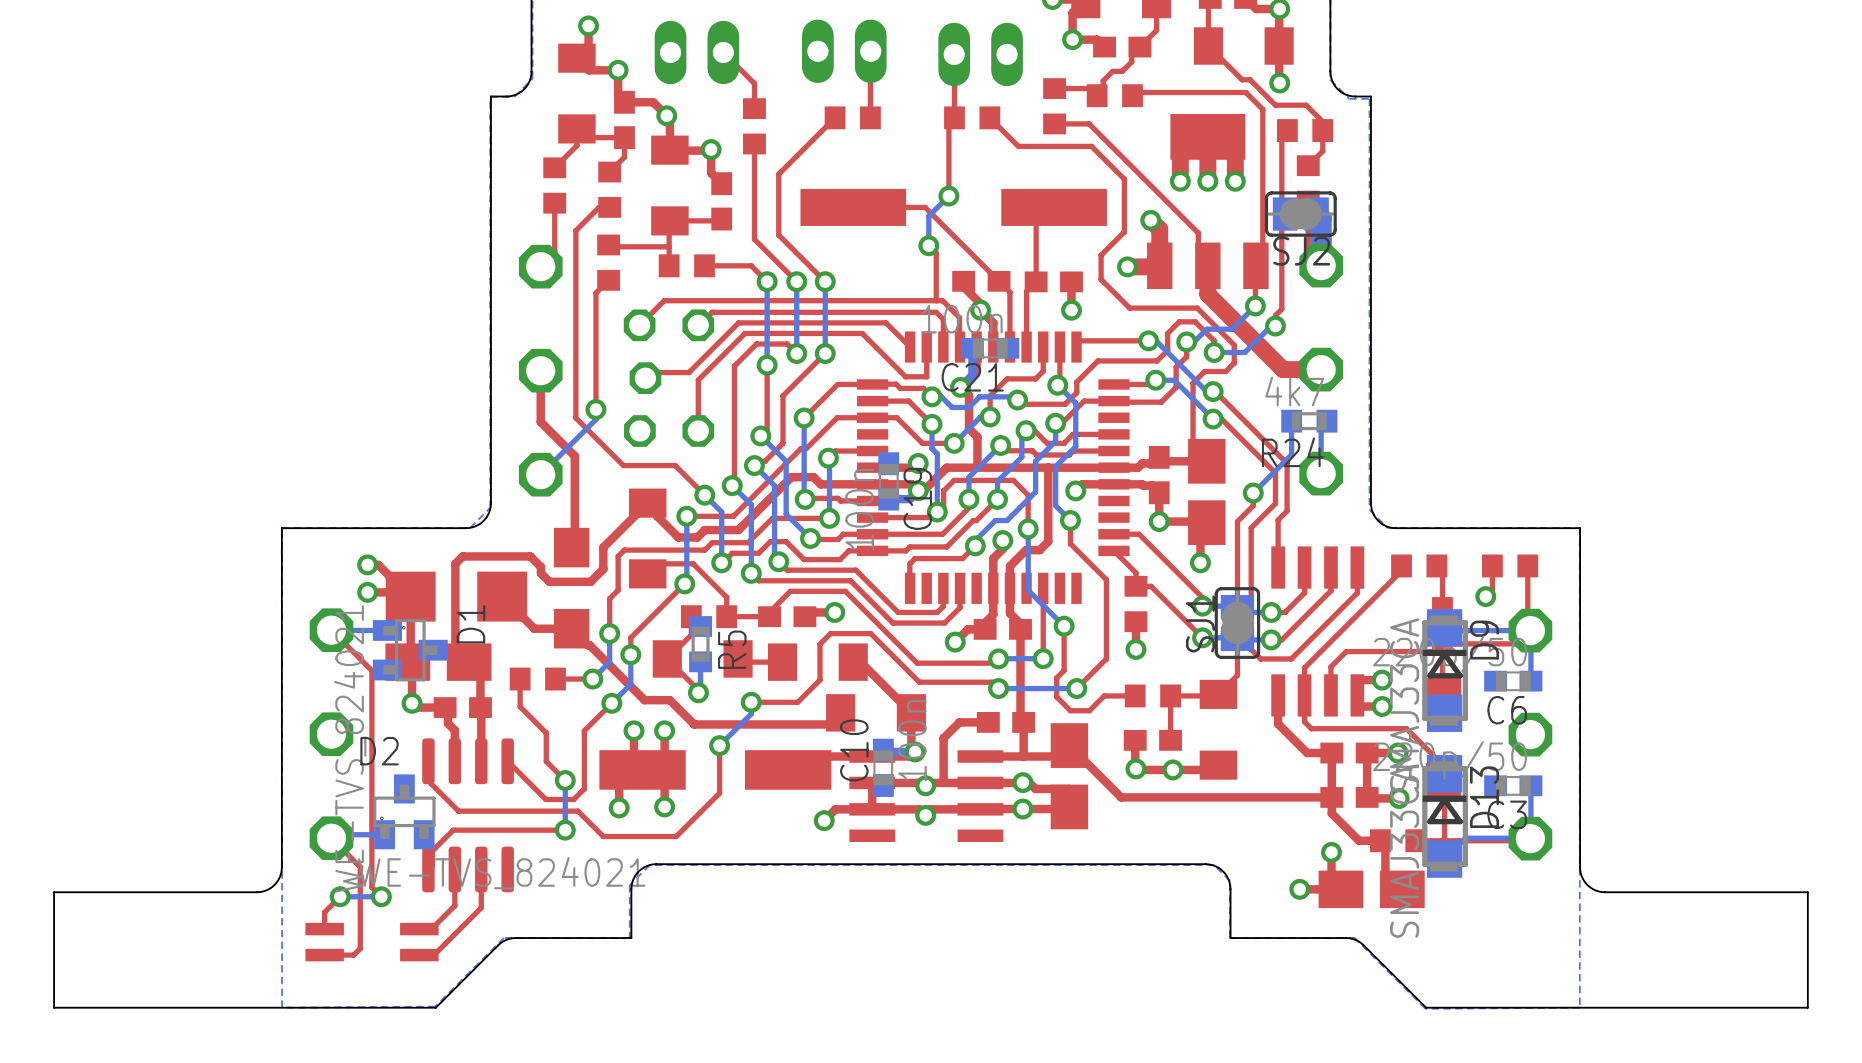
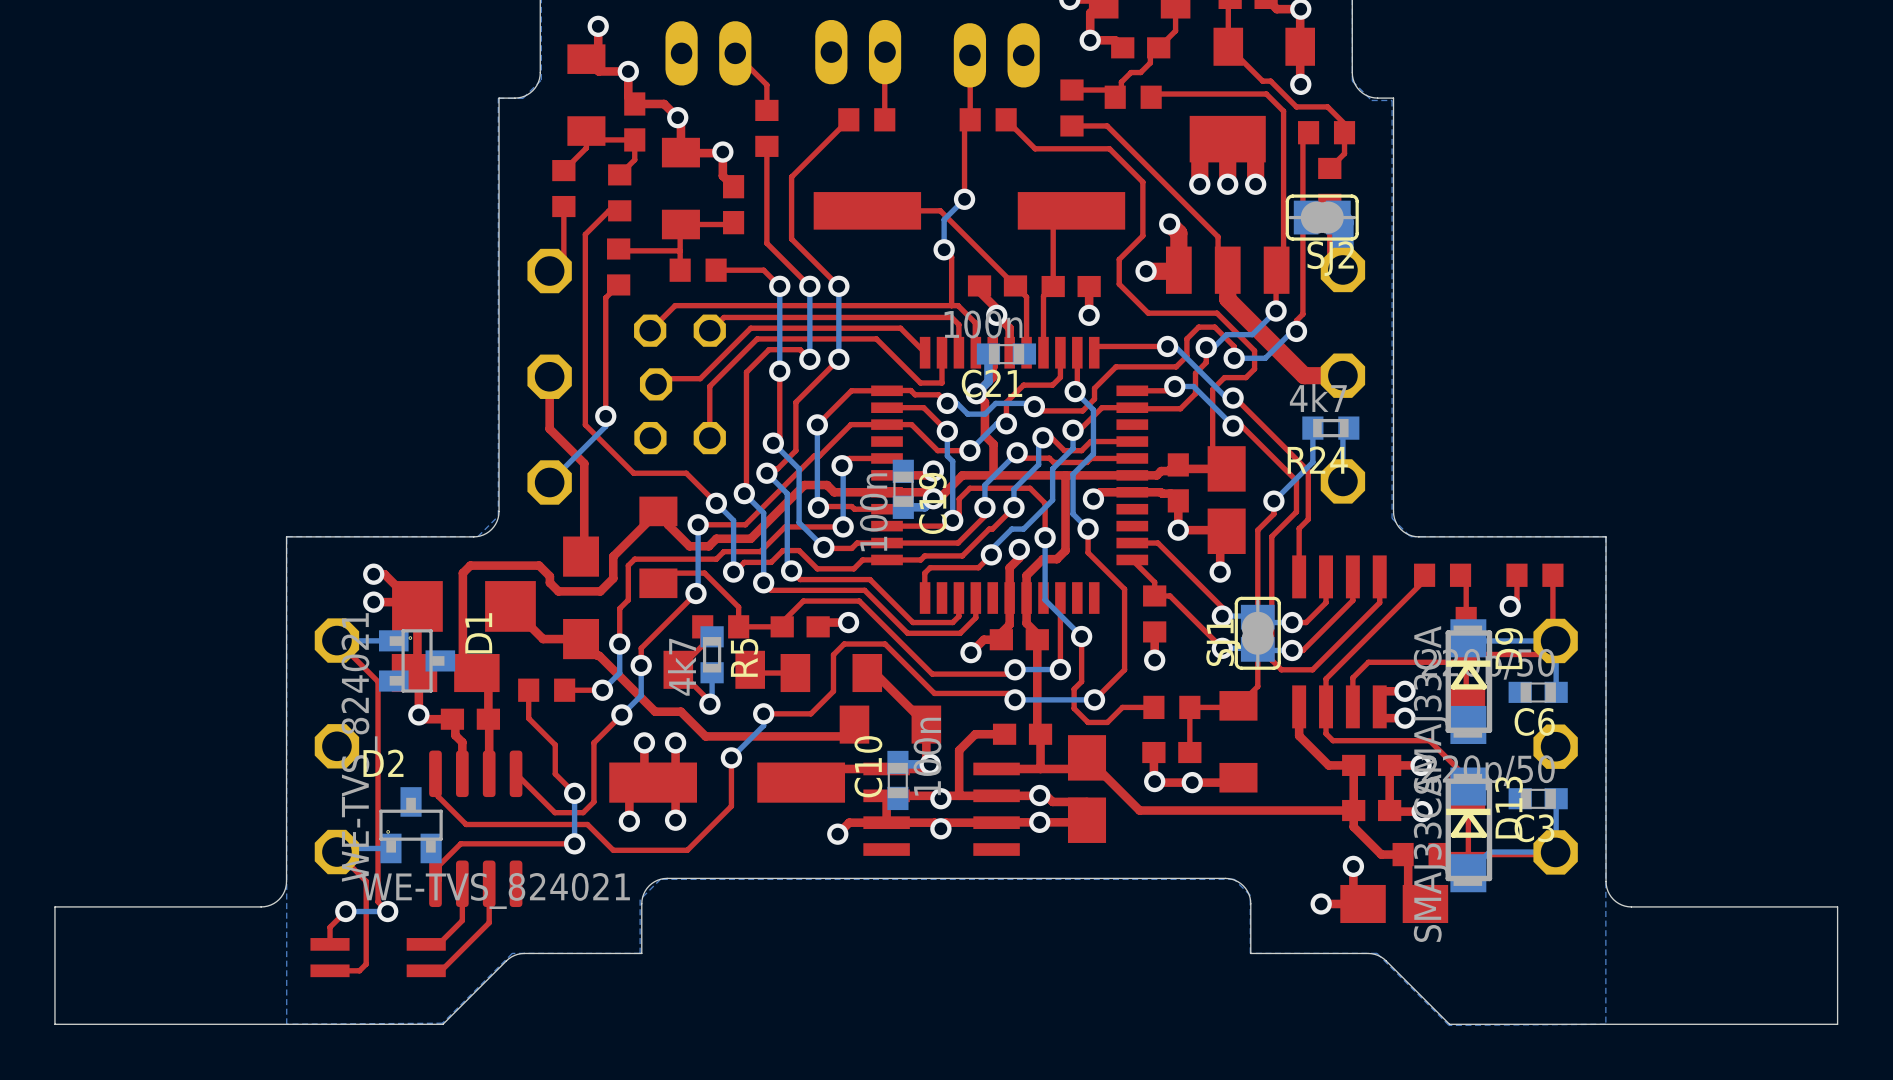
R5 value: none -> 4k7 (681, 667)

